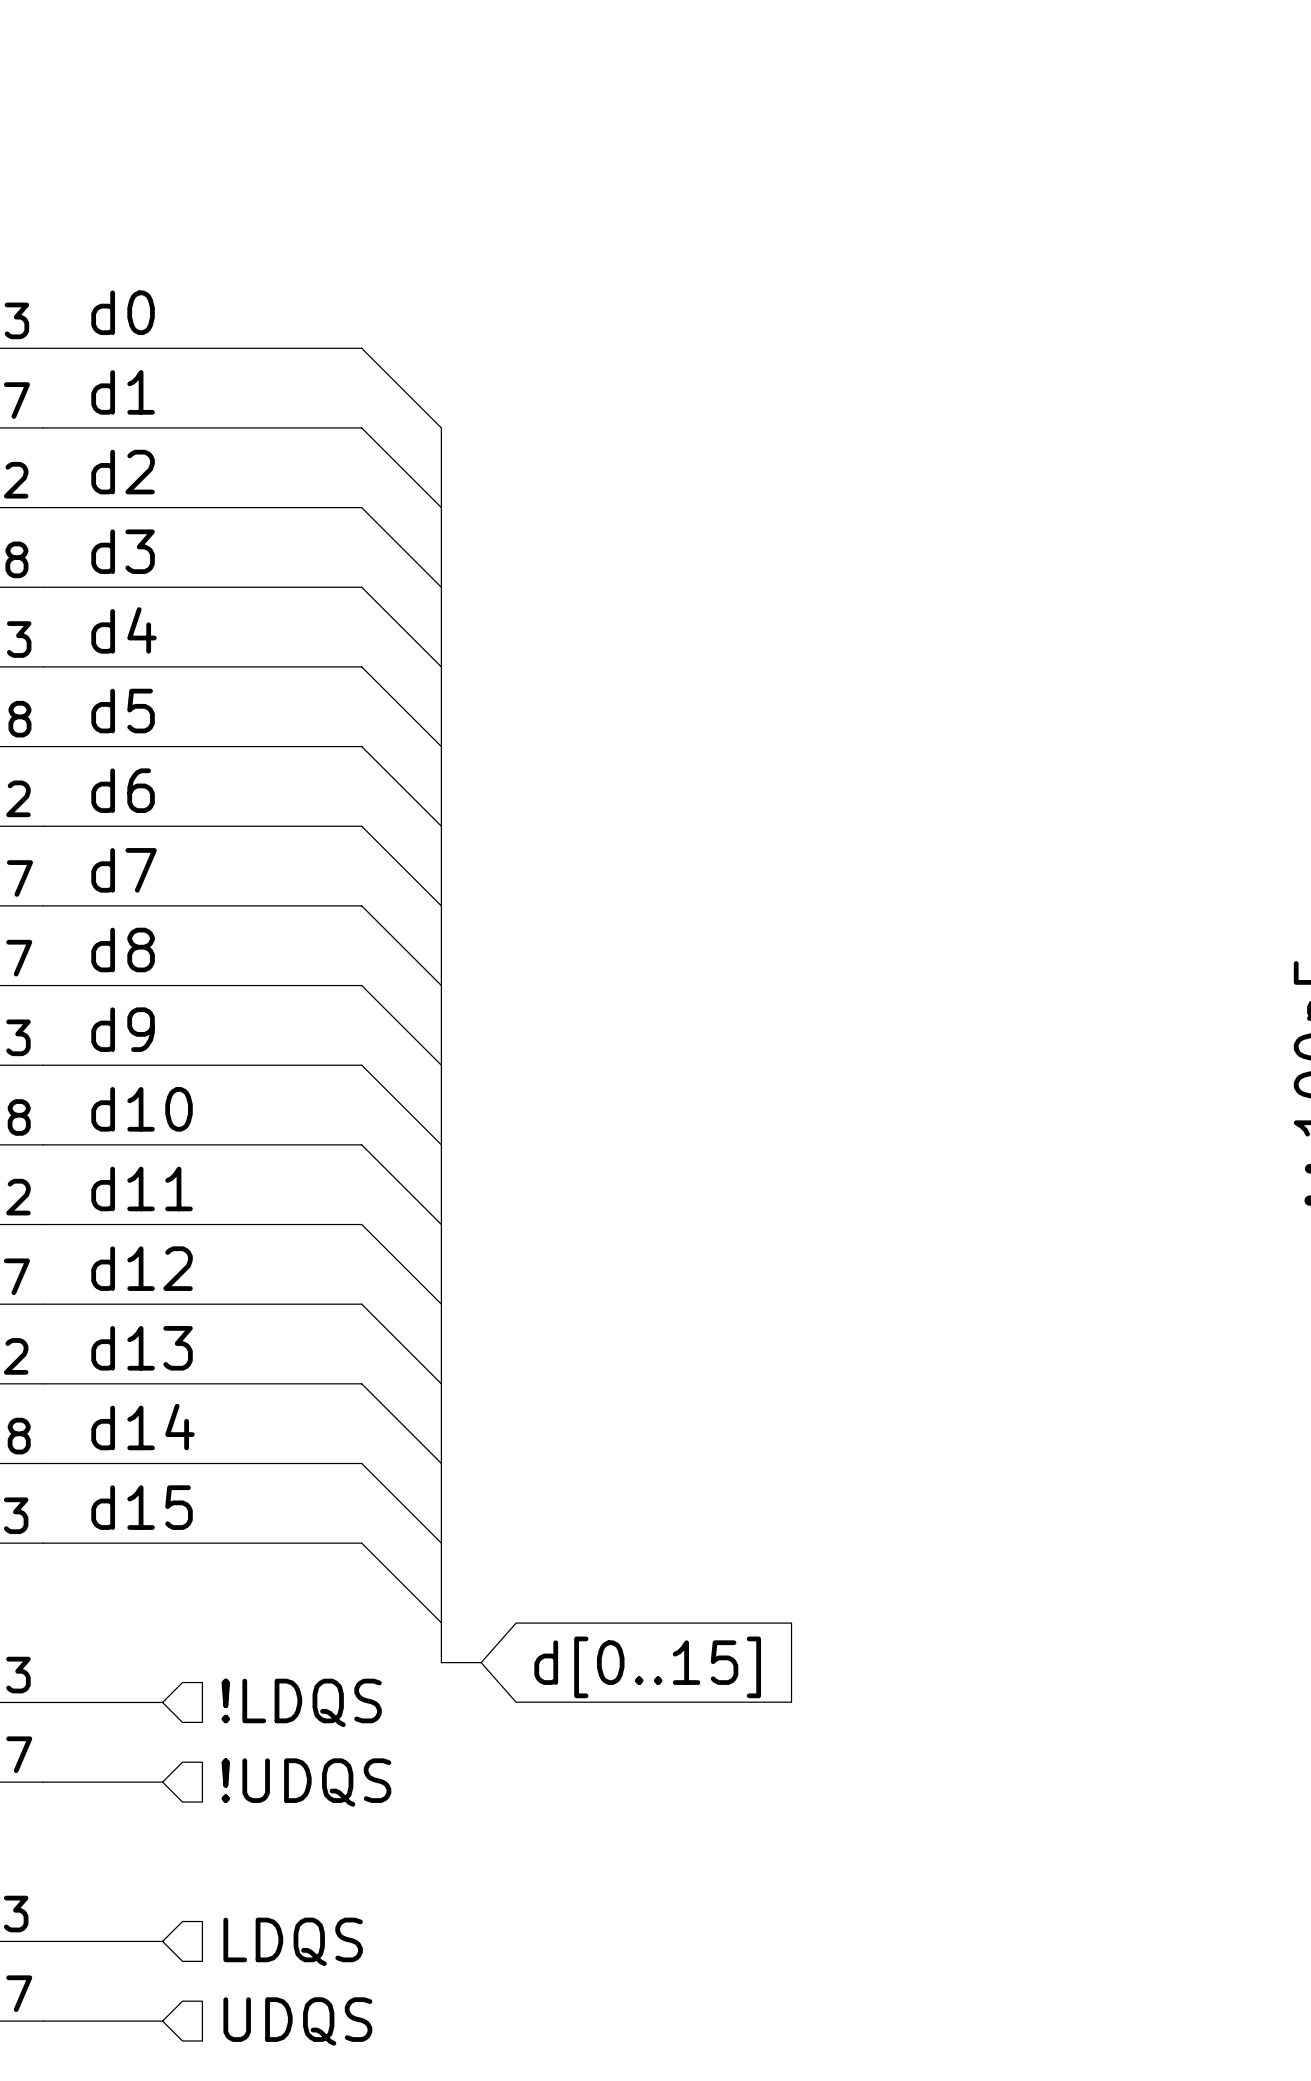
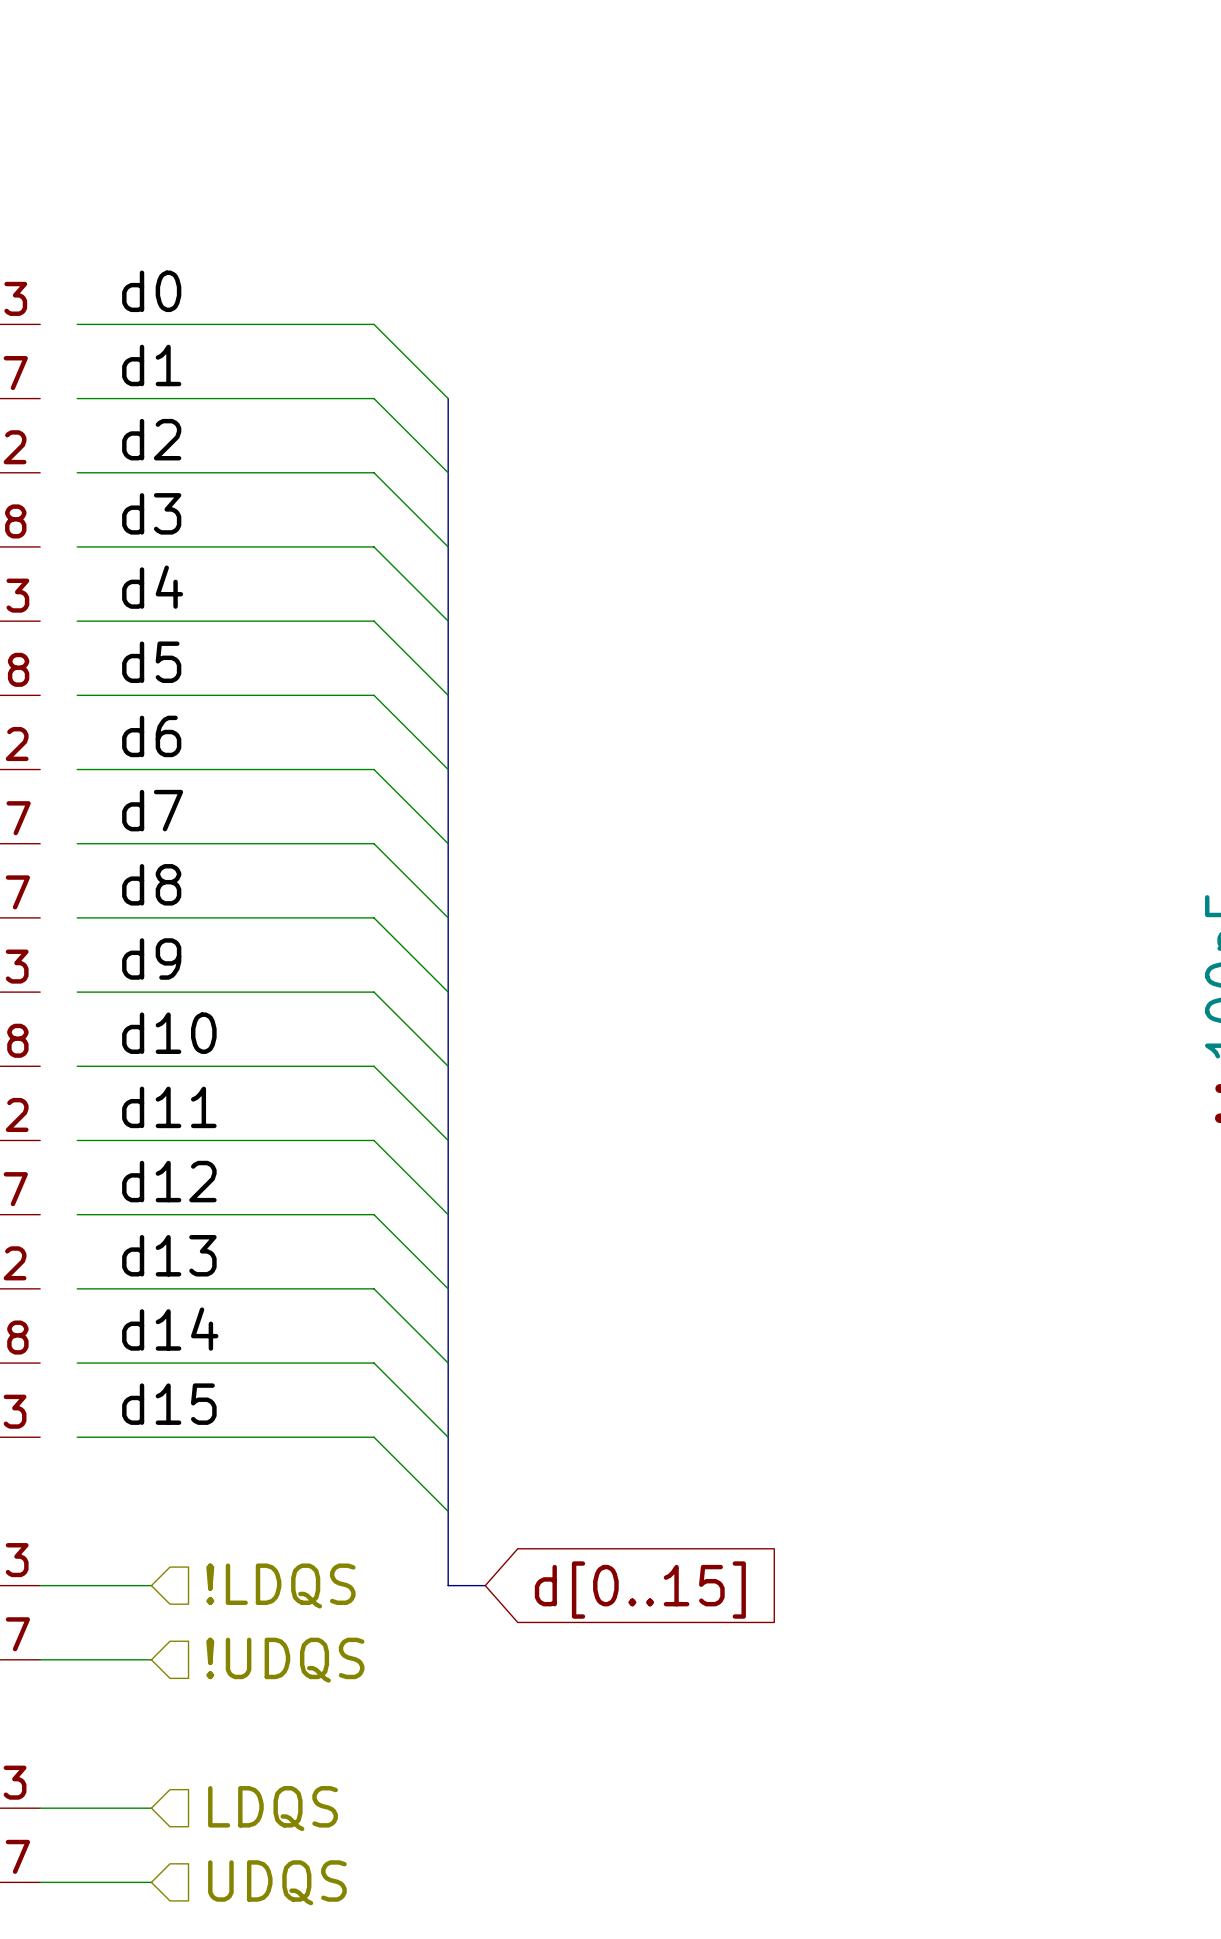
label position: d0 (123, 312) -> d0 (151, 291)
wire: (43, 348) (82, 348) -> none
wire: (361, 348) (441, 427) -> (336, 324) (374, 324) (448, 398)
label position: d1 (123, 392) -> d1 (151, 365)
wire: (43, 427) (82, 427) -> none
wire: (361, 427) (441, 507) -> (336, 398) (374, 398) (448, 472)
bus: (441, 427) (441, 1662) (481, 1662) -> none
bus: none -> (448, 398) (448, 1585) (485, 1585)
label position: d2 (123, 472) -> d2 (151, 439)
wire: (43, 507) (82, 507) -> none
wire: (361, 507) (441, 587) -> (336, 472) (374, 472) (448, 546)
label position: d3 (123, 551) -> d3 (151, 513)
wire: (43, 587) (82, 587) -> none
wire: (361, 587) (441, 666) -> (336, 546) (374, 546) (448, 621)
label position: d4 (124, 630) -> d4 (152, 587)
wire: (43, 666) (82, 666) -> none
wire: (361, 666) (441, 746) -> (336, 621) (374, 621) (448, 695)
label position: d5 (123, 711) -> d5 (151, 662)
wire: (43, 746) (82, 746) -> none
wire: (361, 746) (441, 826) -> (336, 695) (374, 695) (448, 769)
label position: d6 (123, 790) -> d6 (151, 736)
wire: (43, 826) (82, 826) -> none
wire: (361, 826) (441, 905) -> (336, 769) (374, 769) (448, 843)
label position: d7 (124, 870) -> d7 (152, 810)
wire: (43, 905) (82, 905) -> none
wire: (361, 905) (441, 985) -> (336, 843) (374, 843) (448, 917)
label position: d8 (123, 950) -> d8 (151, 884)
wire: (43, 985) (82, 985) -> none
wire: (361, 985) (441, 1065) -> (336, 917) (374, 917) (448, 992)
label position: d9 (123, 1029) -> d9 (151, 959)
wire: (43, 1065) (82, 1065) -> none
wire: (361, 1065) (441, 1144) -> (336, 992) (374, 992) (448, 1066)
label position: d10 (142, 1109) -> d10 (169, 1033)
wire: (43, 1144) (82, 1144) -> none
wire: (361, 1144) (441, 1224) -> (336, 1066) (374, 1066) (448, 1140)
label position: d11 (142, 1188) -> d11 (169, 1107)
wire: (43, 1224) (82, 1224) -> none
wire: (361, 1224) (441, 1304) -> (336, 1140) (374, 1140) (448, 1214)
label position: d12 (142, 1268) -> d12 (169, 1181)
wire: (43, 1304) (82, 1304) -> none
wire: (361, 1304) (441, 1383) -> (336, 1214) (374, 1214) (448, 1288)
label position: d13 (142, 1348) -> d13 (169, 1255)
wire: (43, 1383) (82, 1383) -> none
wire: (361, 1383) (441, 1463) -> (336, 1288) (374, 1288) (448, 1363)
label position: d14 (142, 1427) -> d14 (170, 1329)
wire: (43, 1463) (82, 1463) -> none
wire: (361, 1463) (441, 1543) -> (336, 1363) (374, 1363) (448, 1437)
label position: d15 (142, 1507) -> d15 (169, 1404)
wire: (43, 1543) (82, 1543) -> none
wire: (361, 1543) (441, 1622) -> (336, 1437) (374, 1437) (448, 1511)
global label position: d[0..15] (647, 1667) -> d[0..15] (640, 1590)

